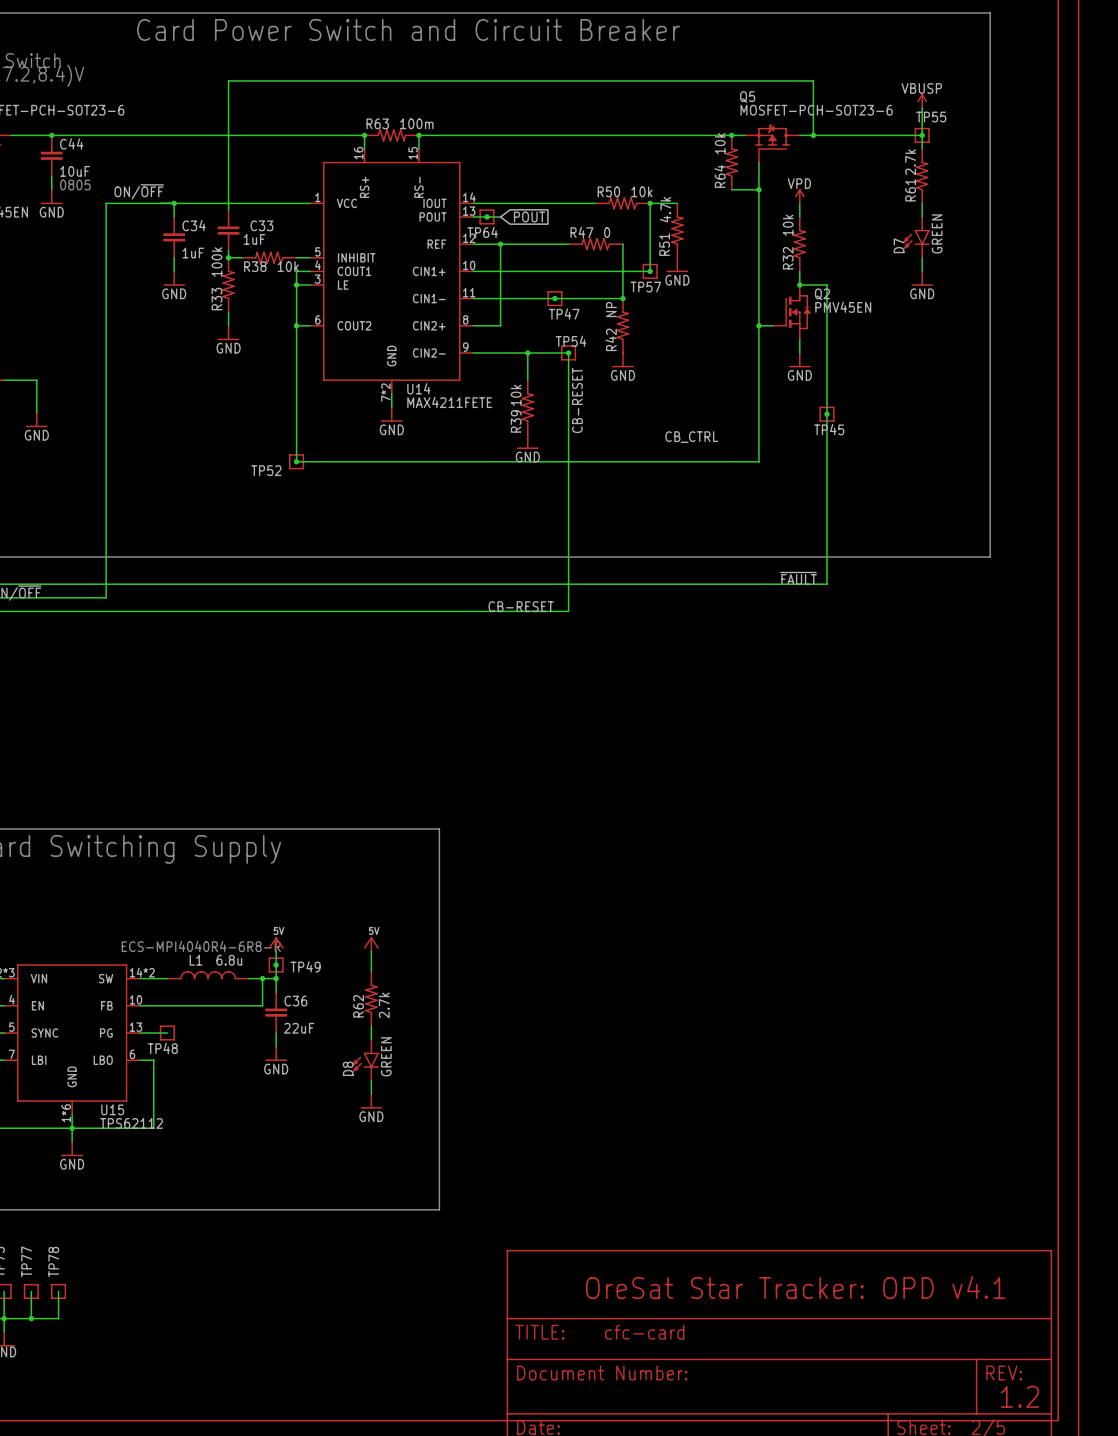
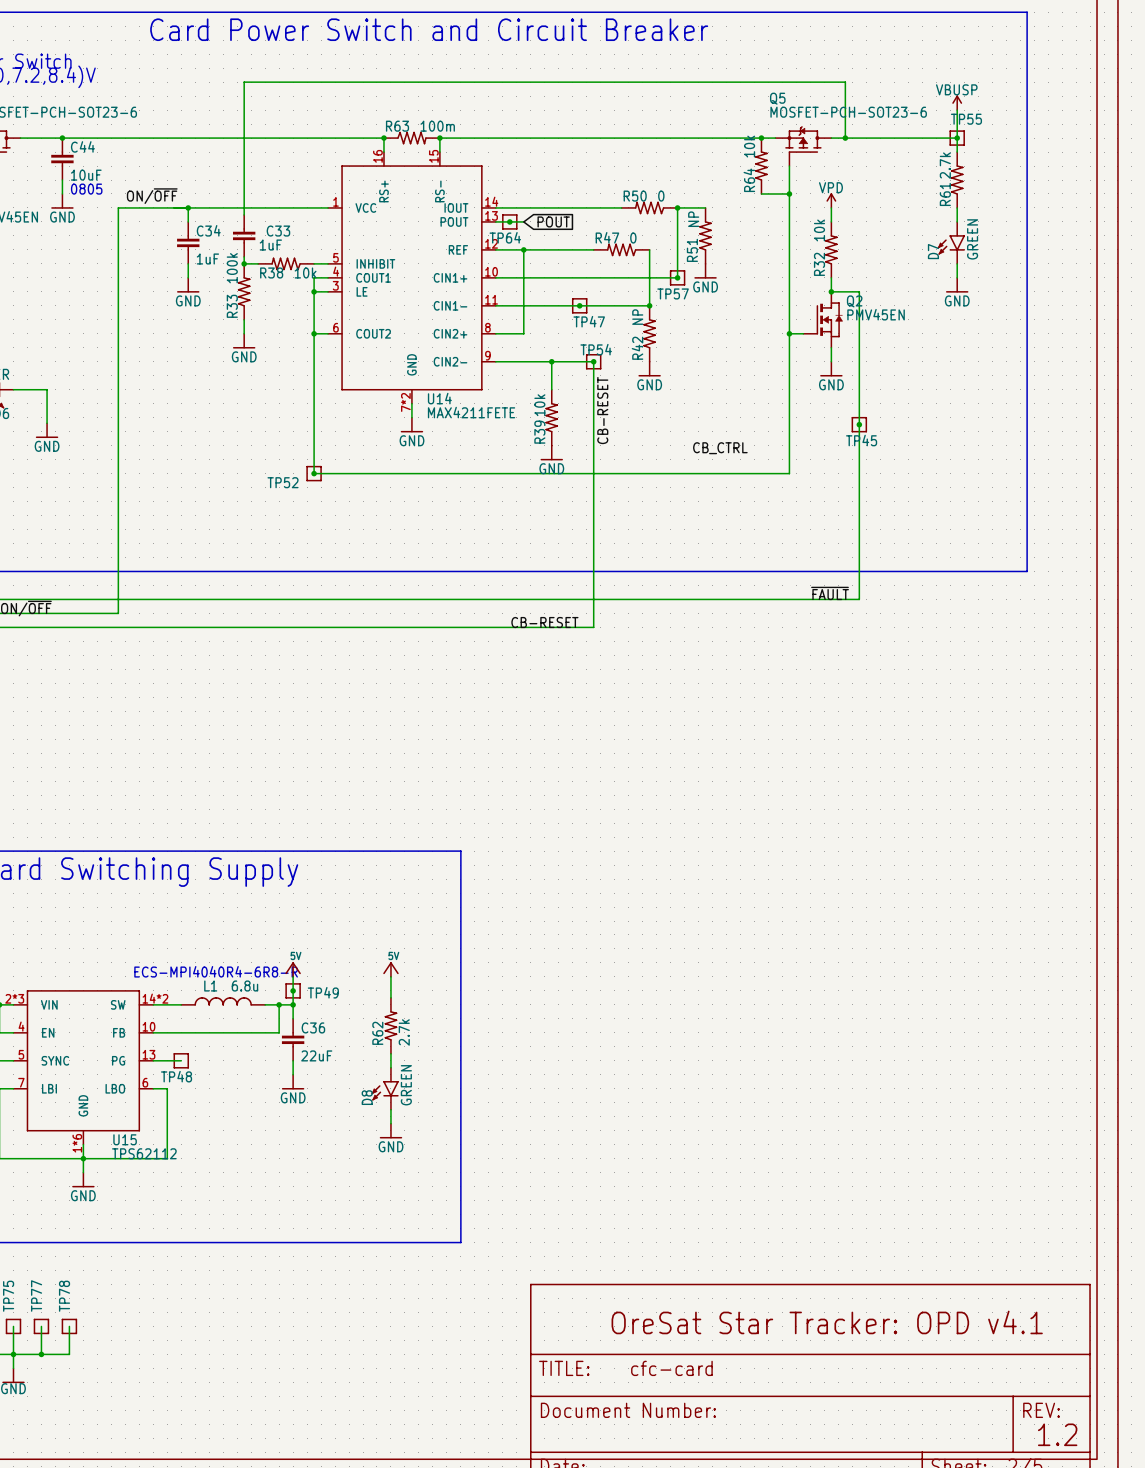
R50 value: 10k (641, 191) -> 0 (661, 196)
R51 value: 4.7k (665, 209) -> NP (693, 219)

